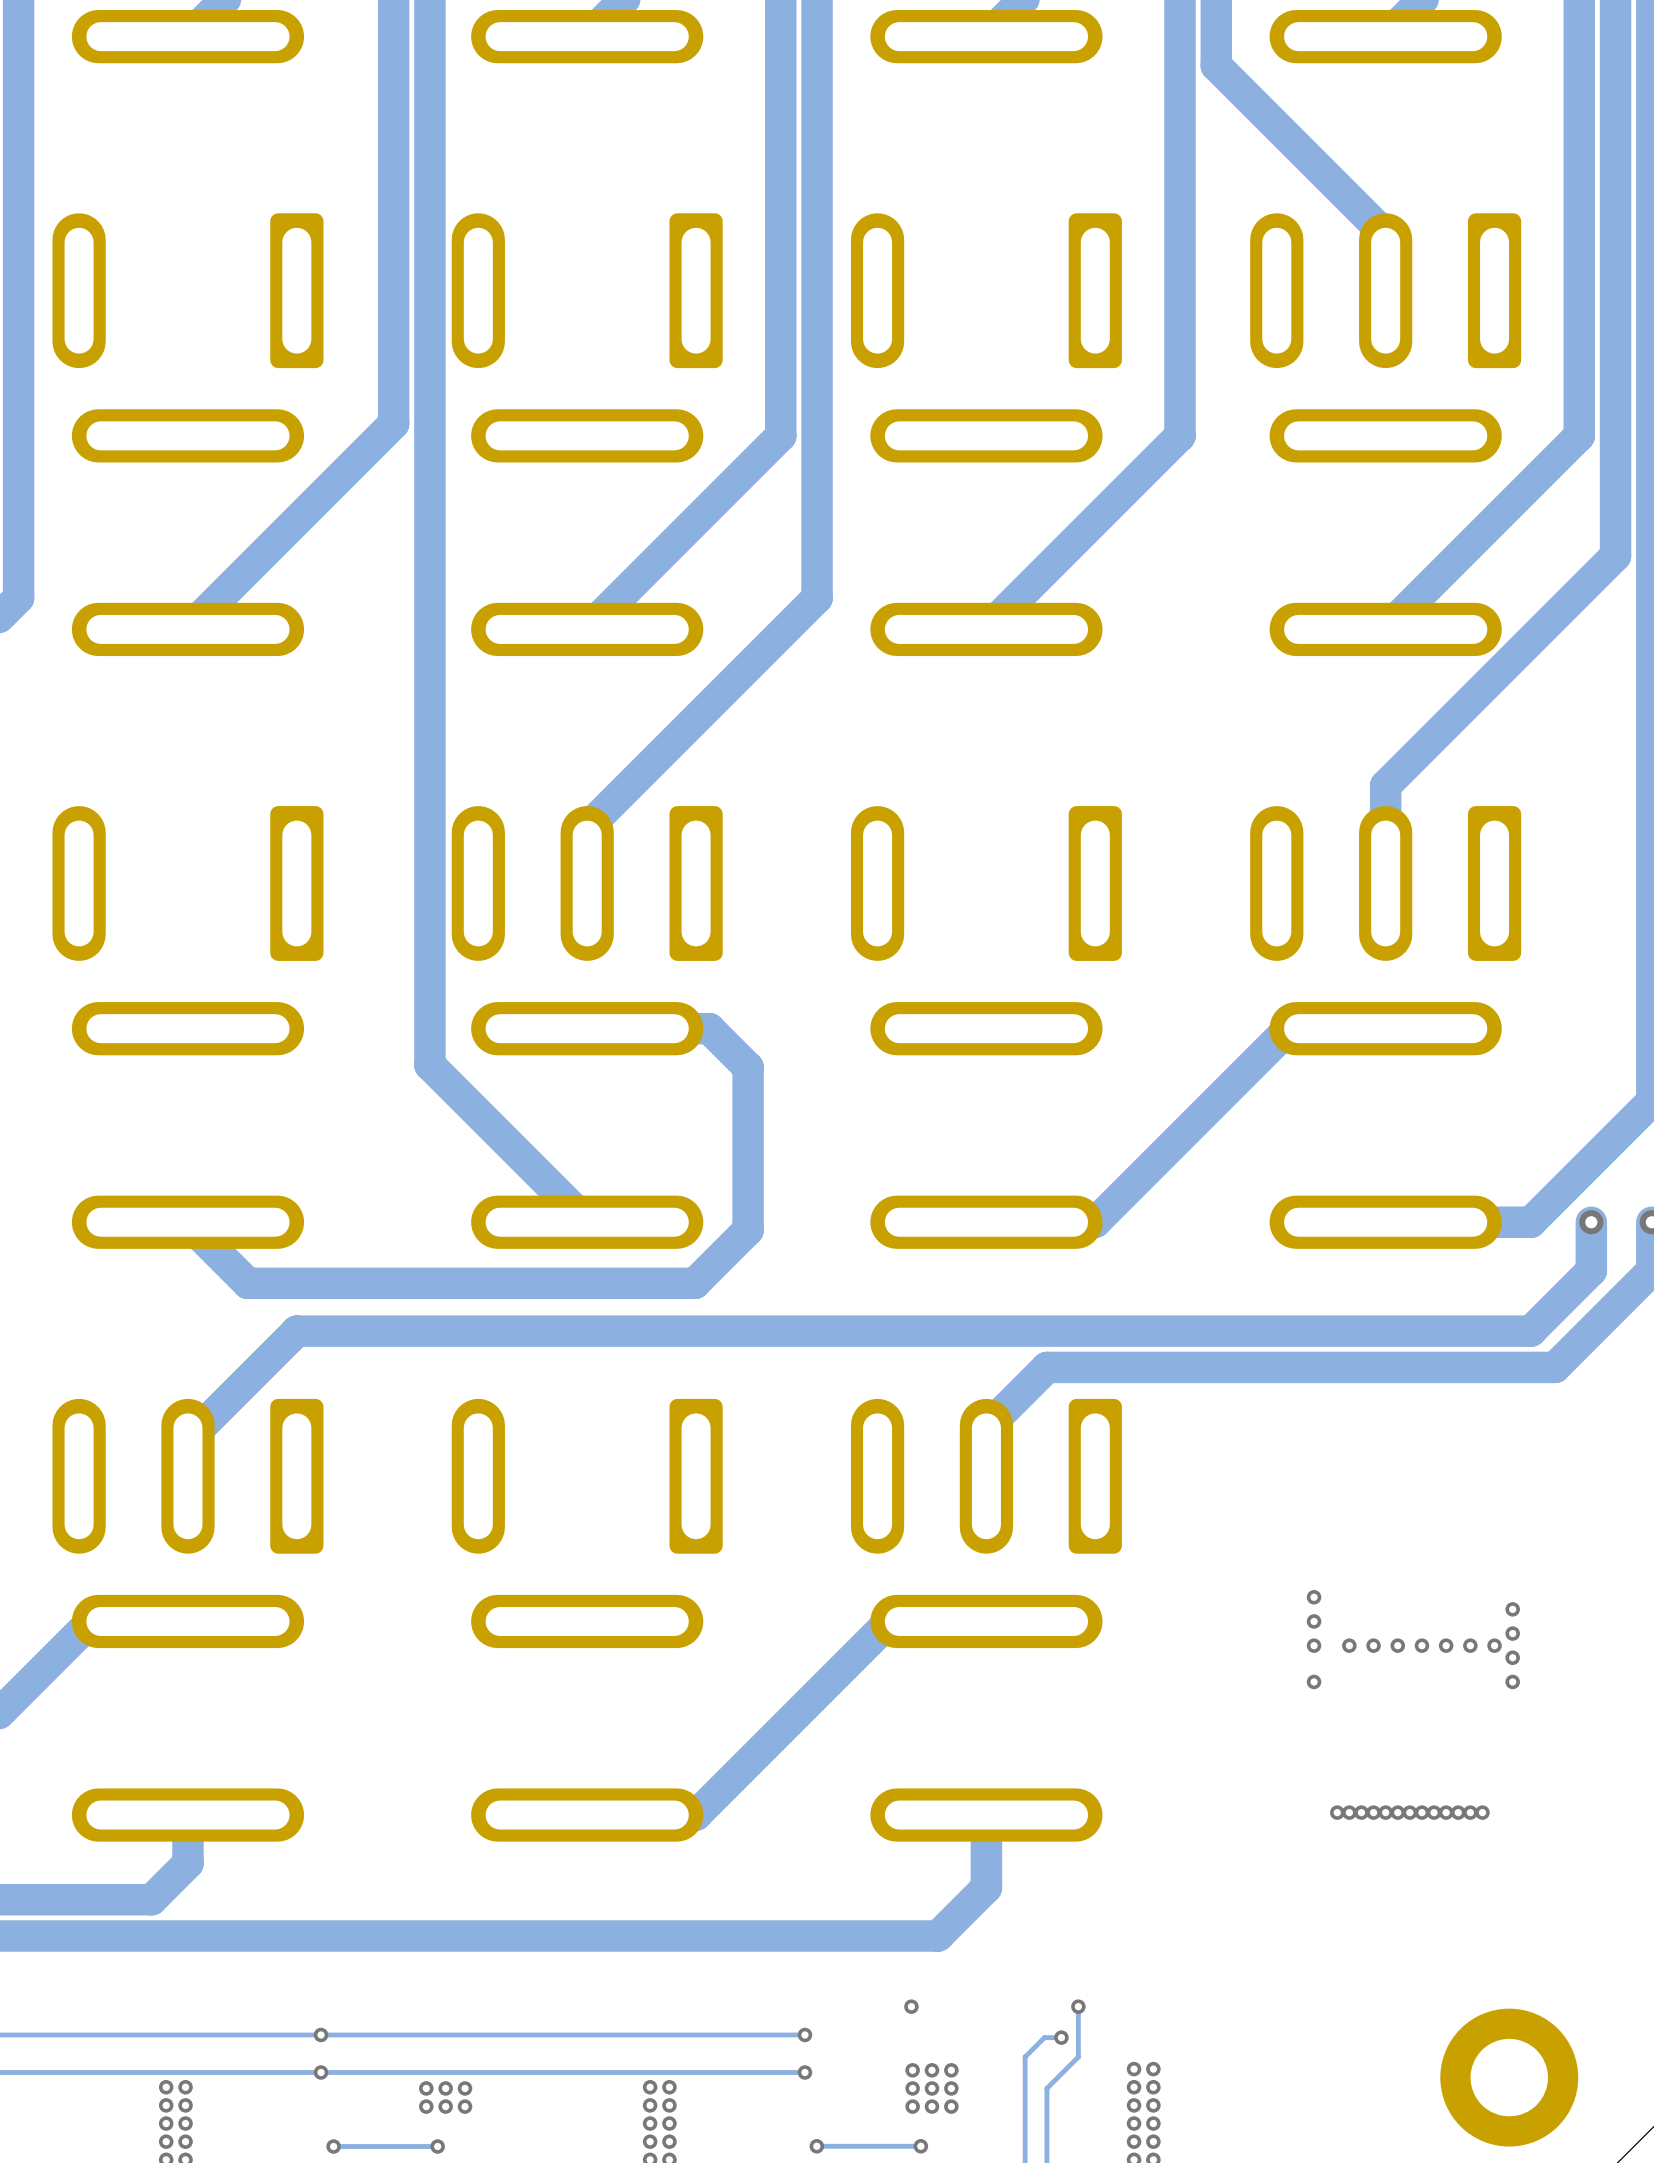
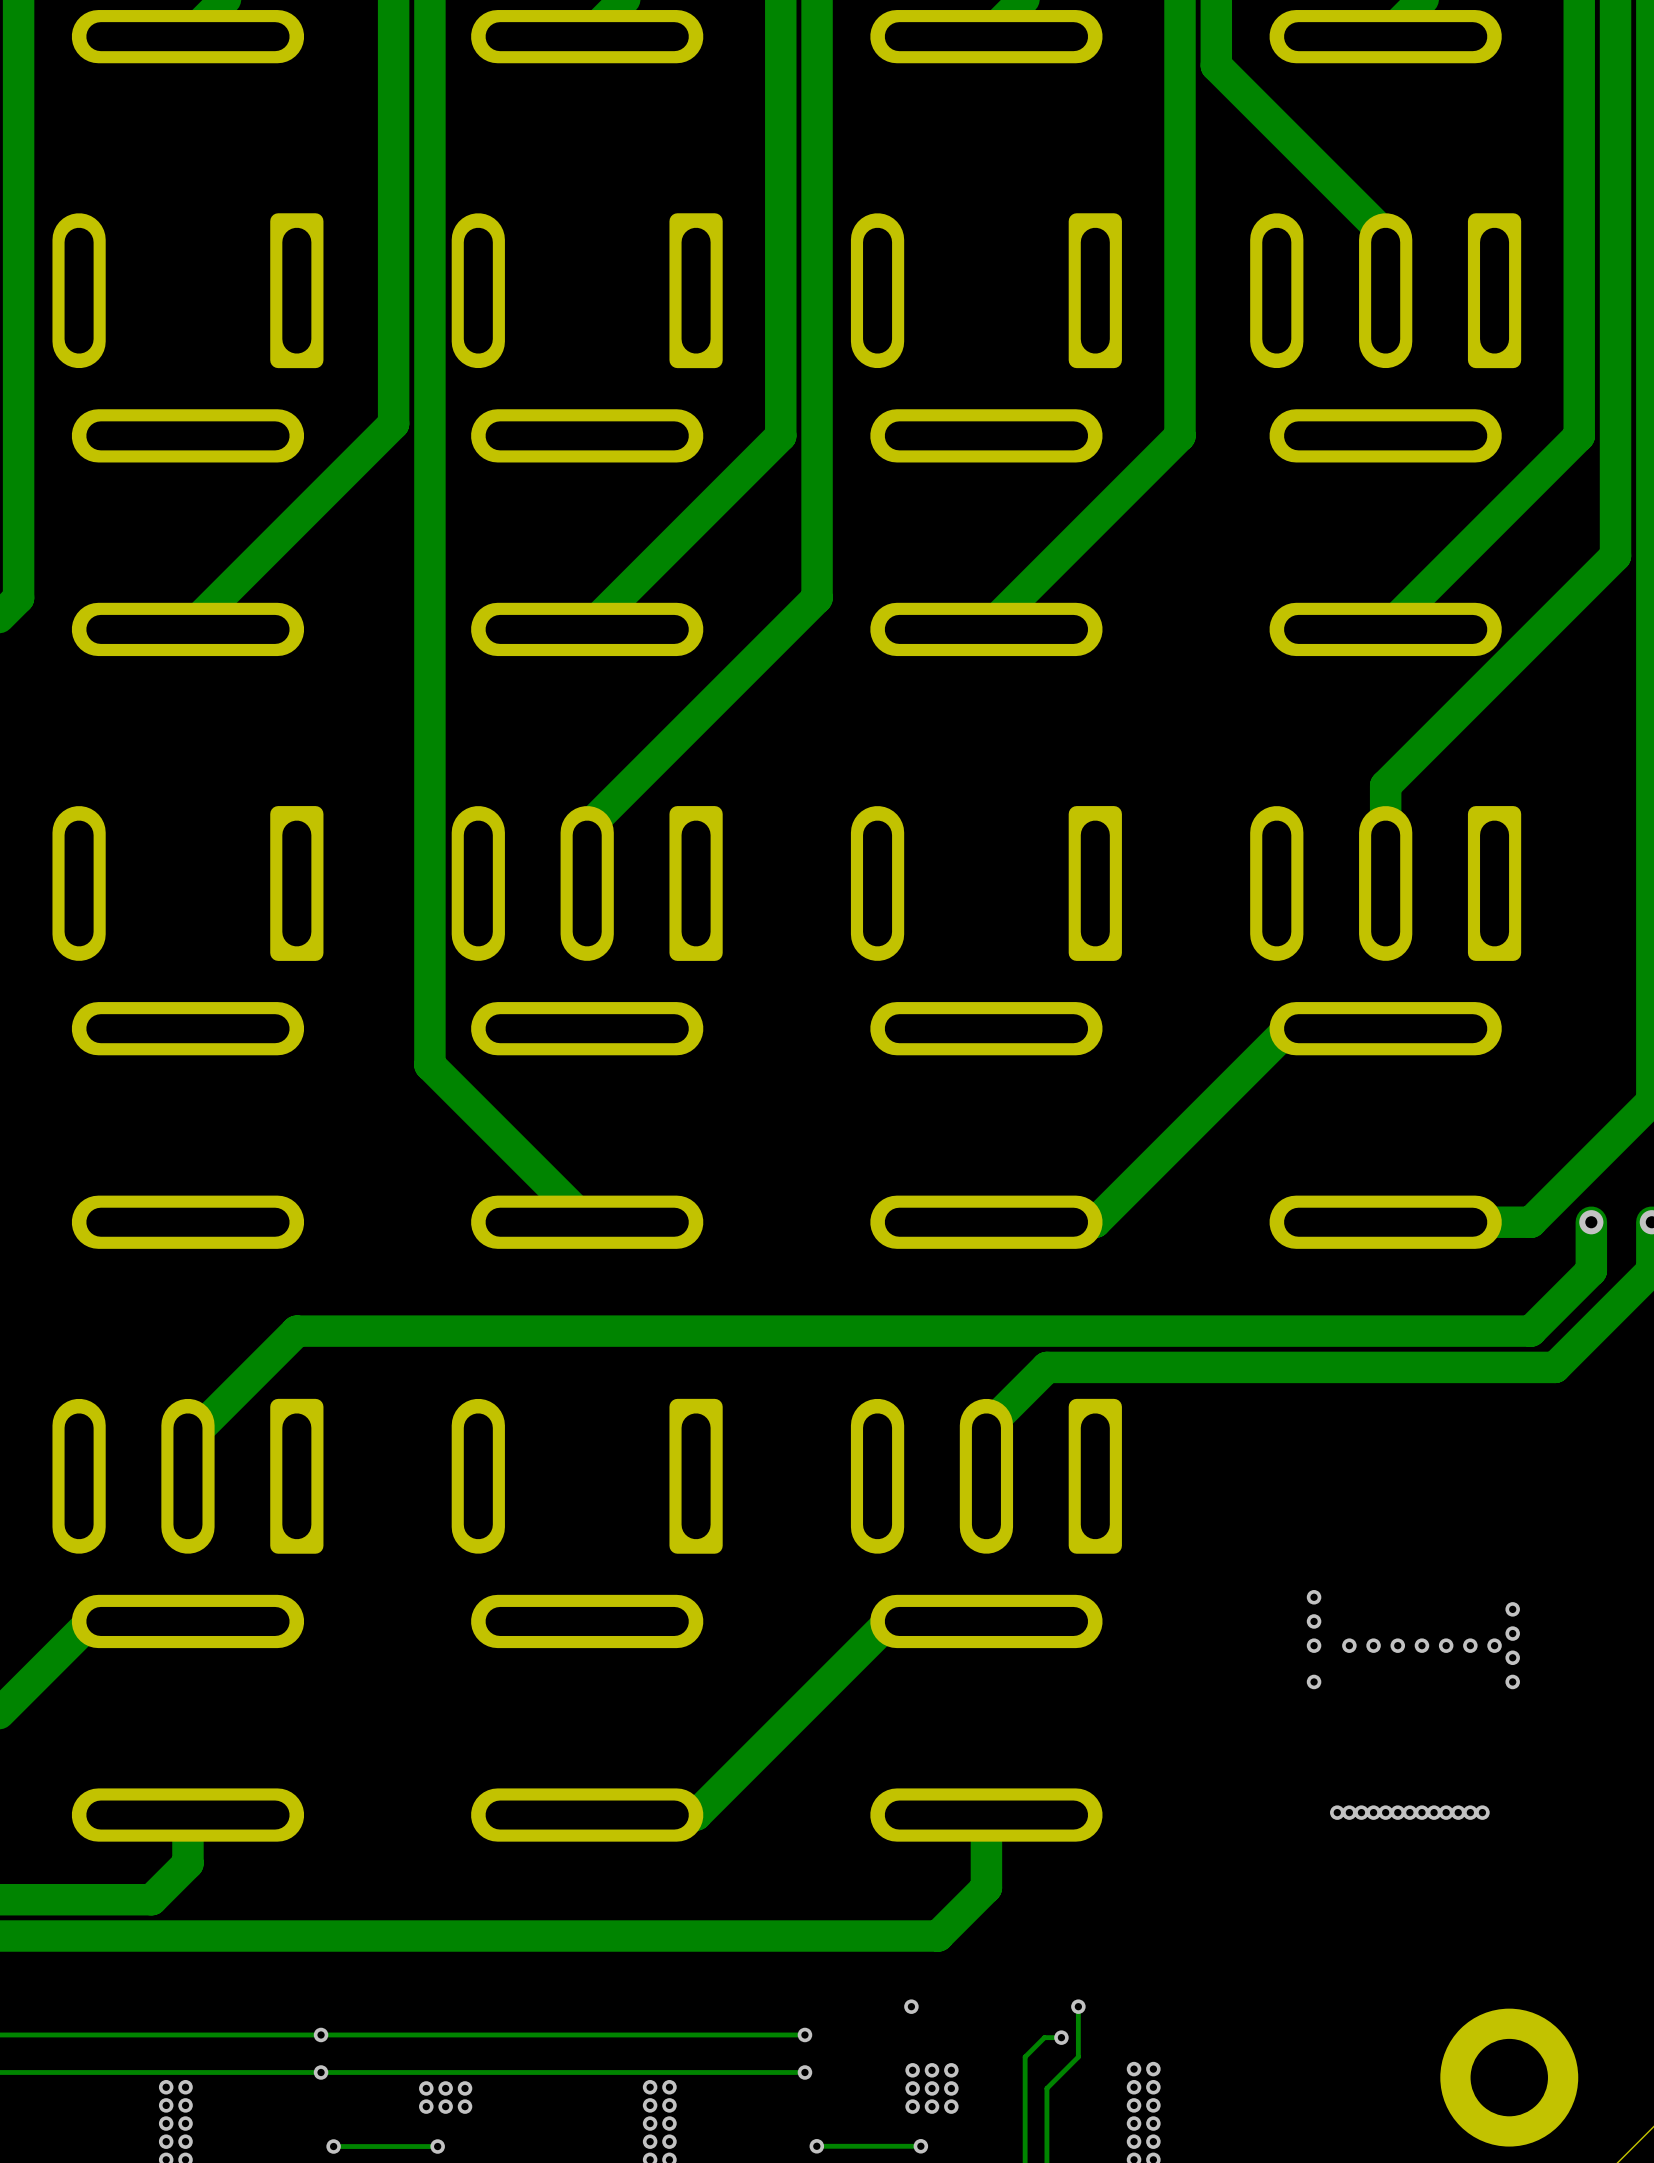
track: (587, 1028) (709, 1028) (748, 1067) (748, 1230) (694, 1283) (247, 1283) (187, 1222) -> none

